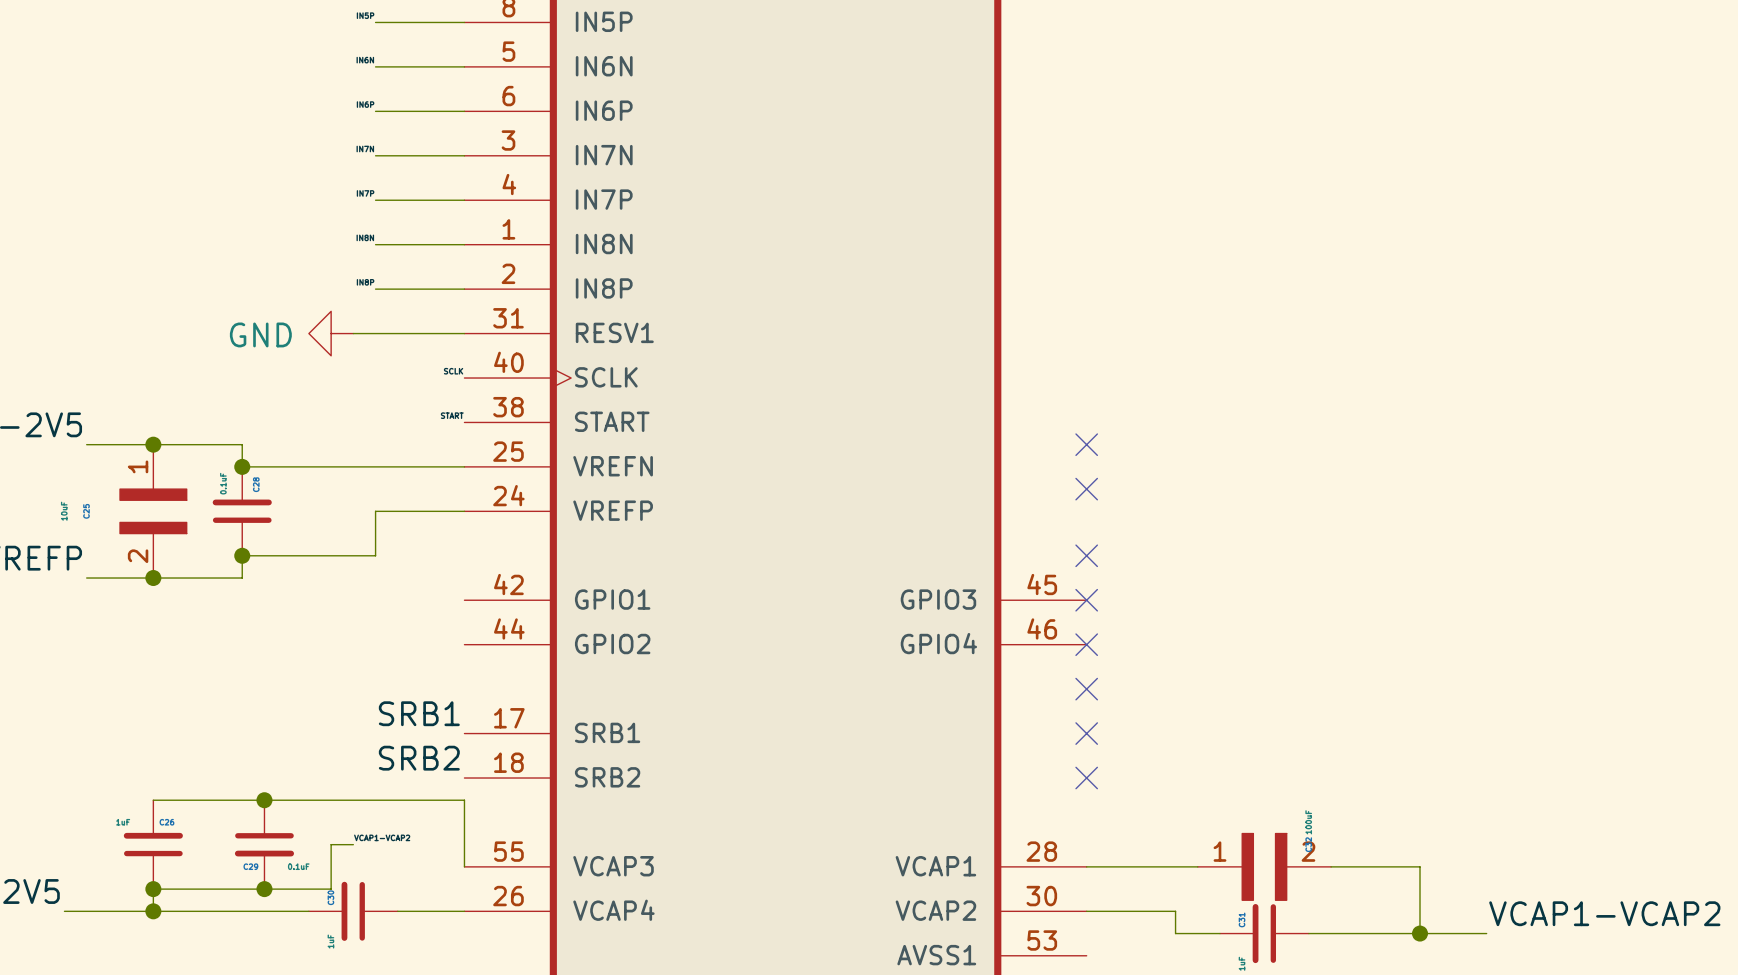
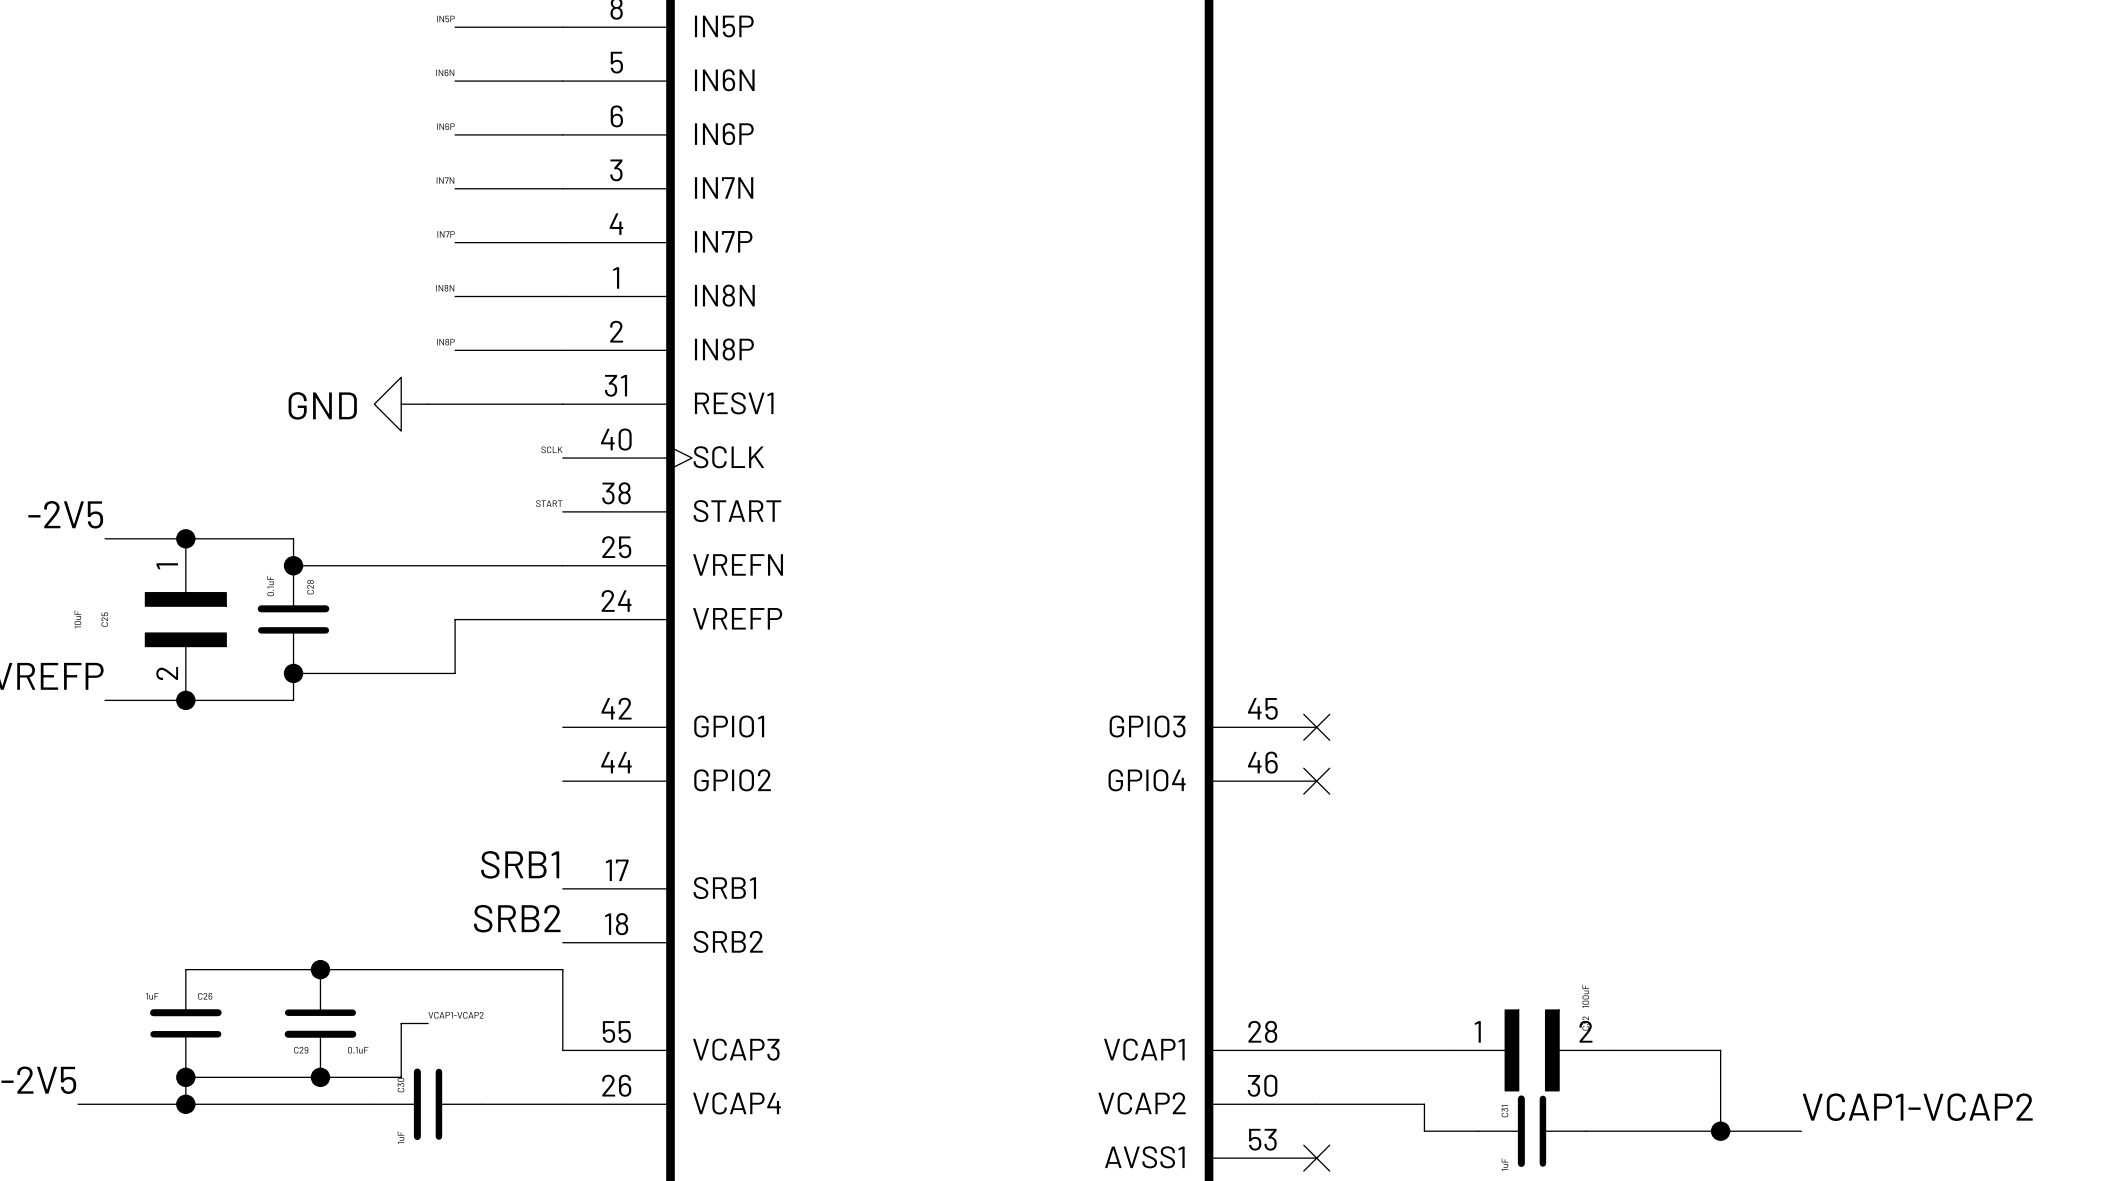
no-connect mark: (1086, 444) -> none
no-connect mark: (1086, 489) -> none
no-connect mark: (1086, 555) -> none
no-connect mark: (1086, 689) -> none
no-connect mark: (1086, 733) -> none
no-connect mark: (1086, 778) -> none
no-connect mark: none -> (1316, 1158)

